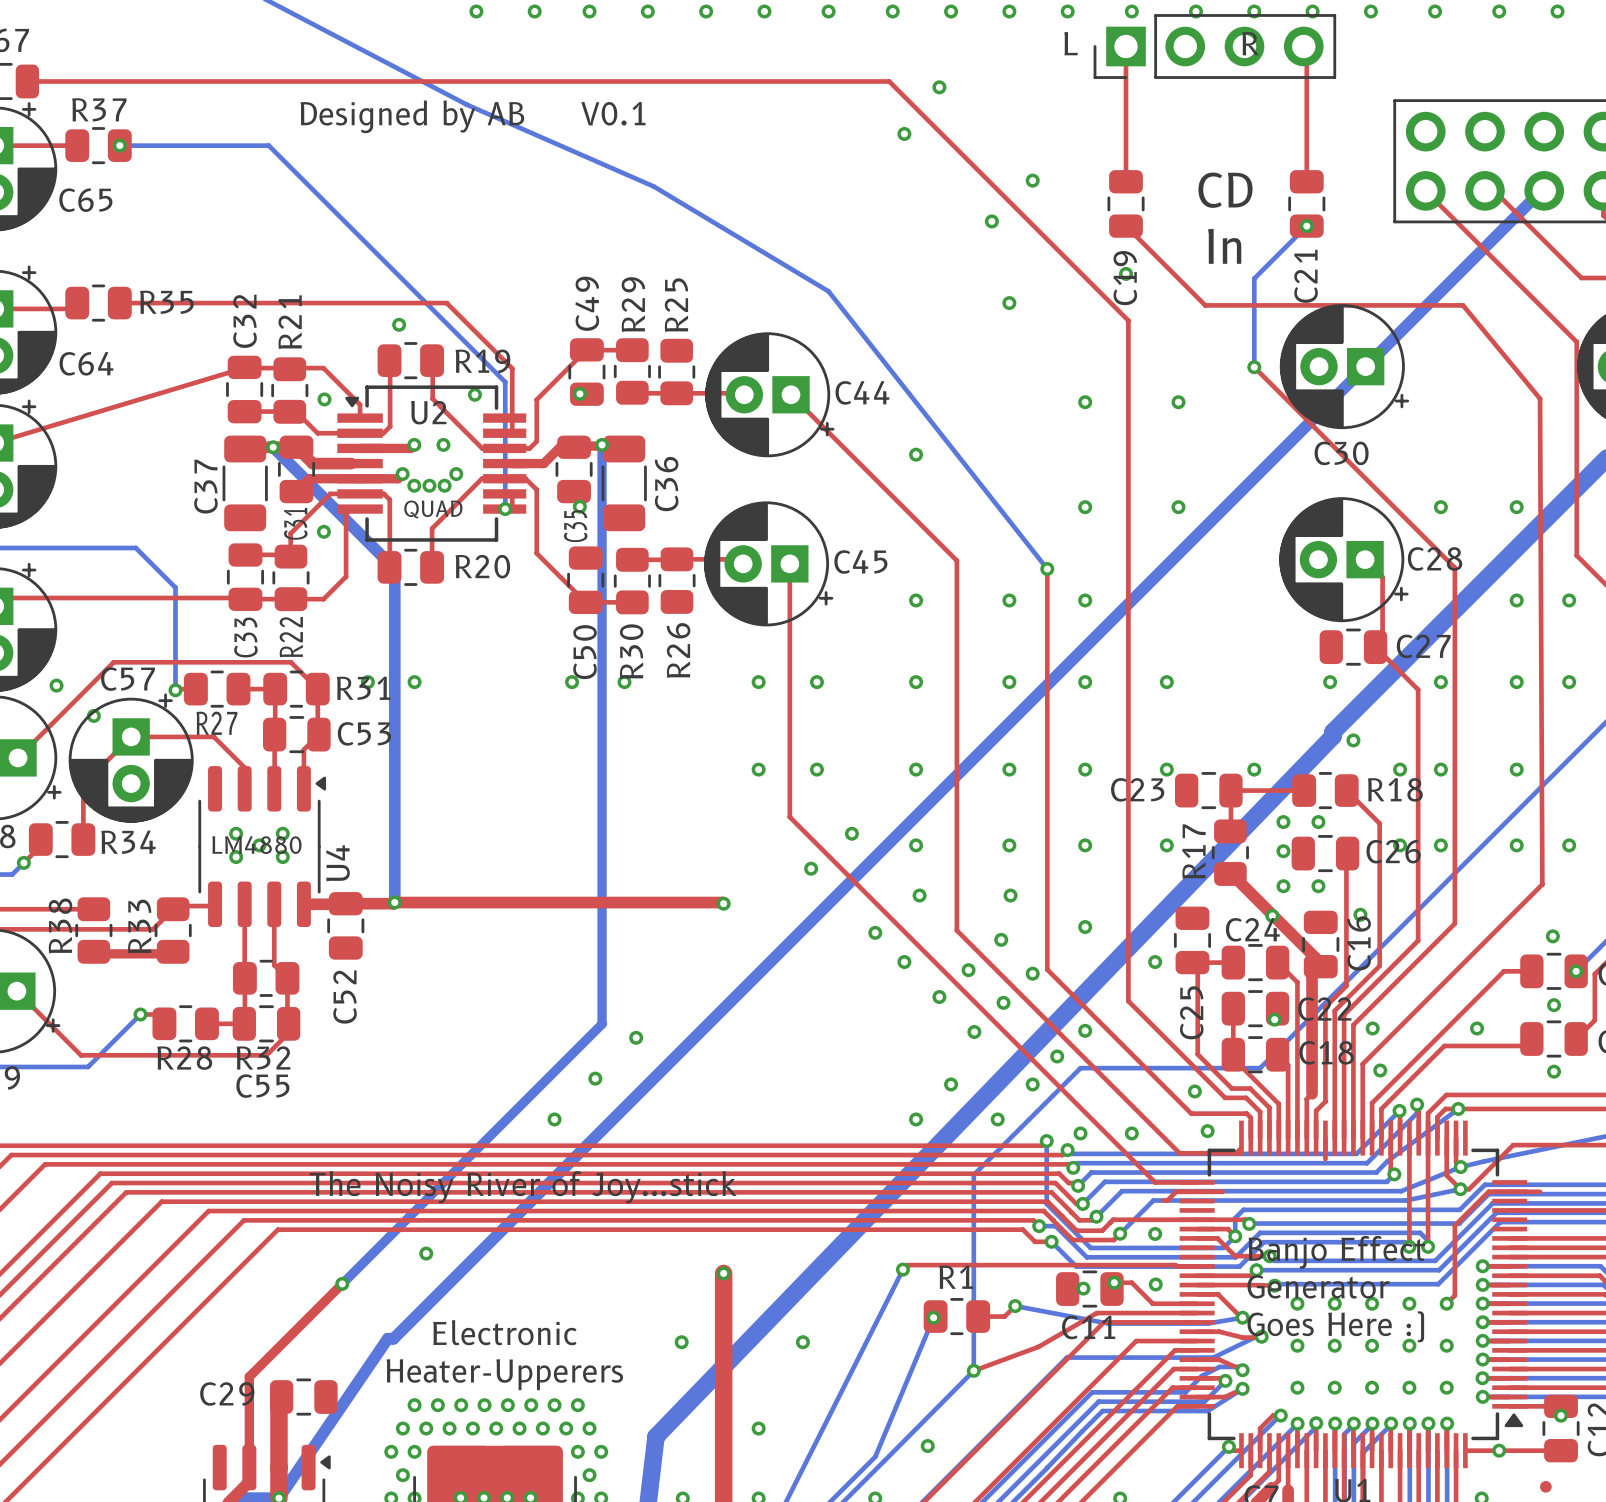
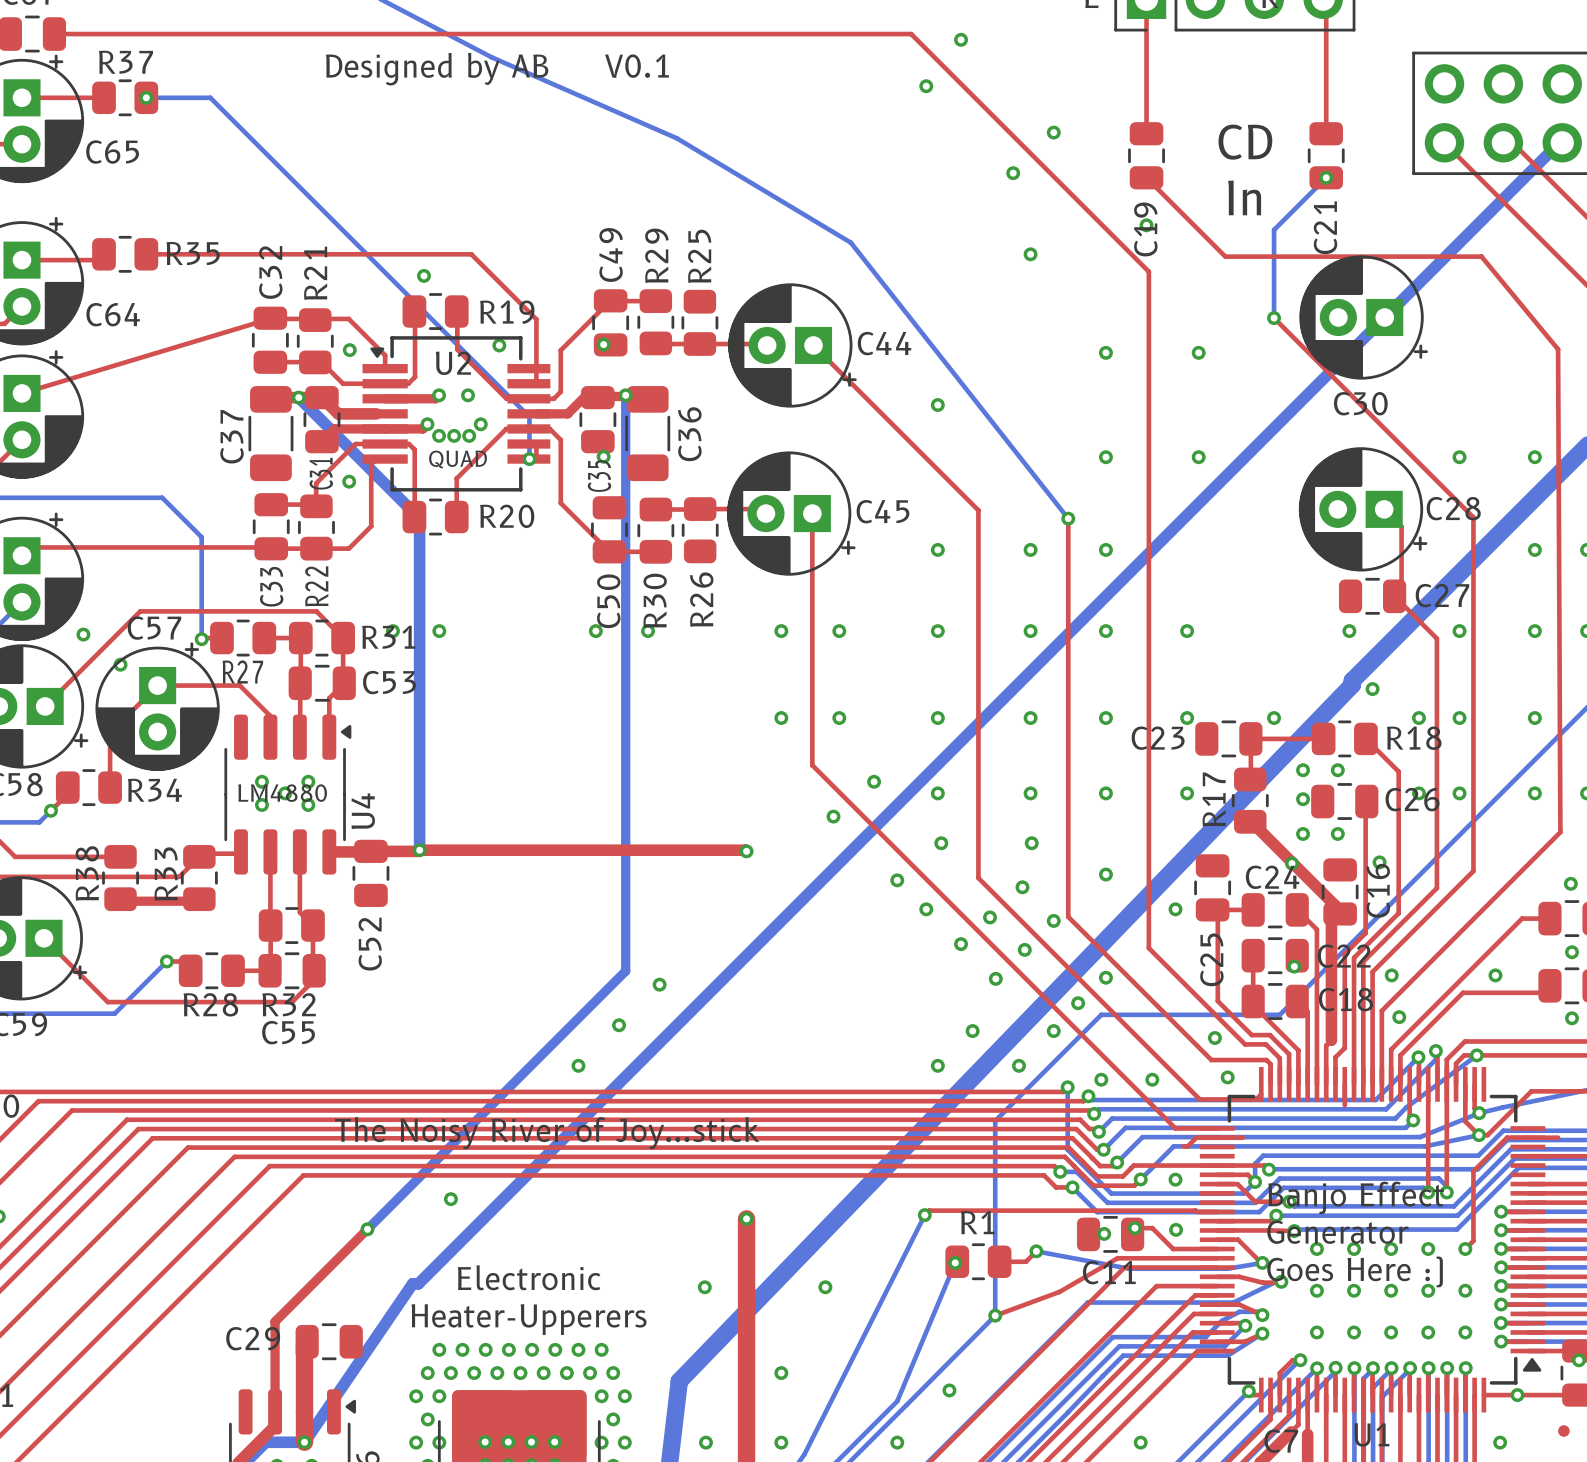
bottom track: (184, 145) (268, 145) (505, 382) (505, 466) -> (210, 97) (529, 416)

